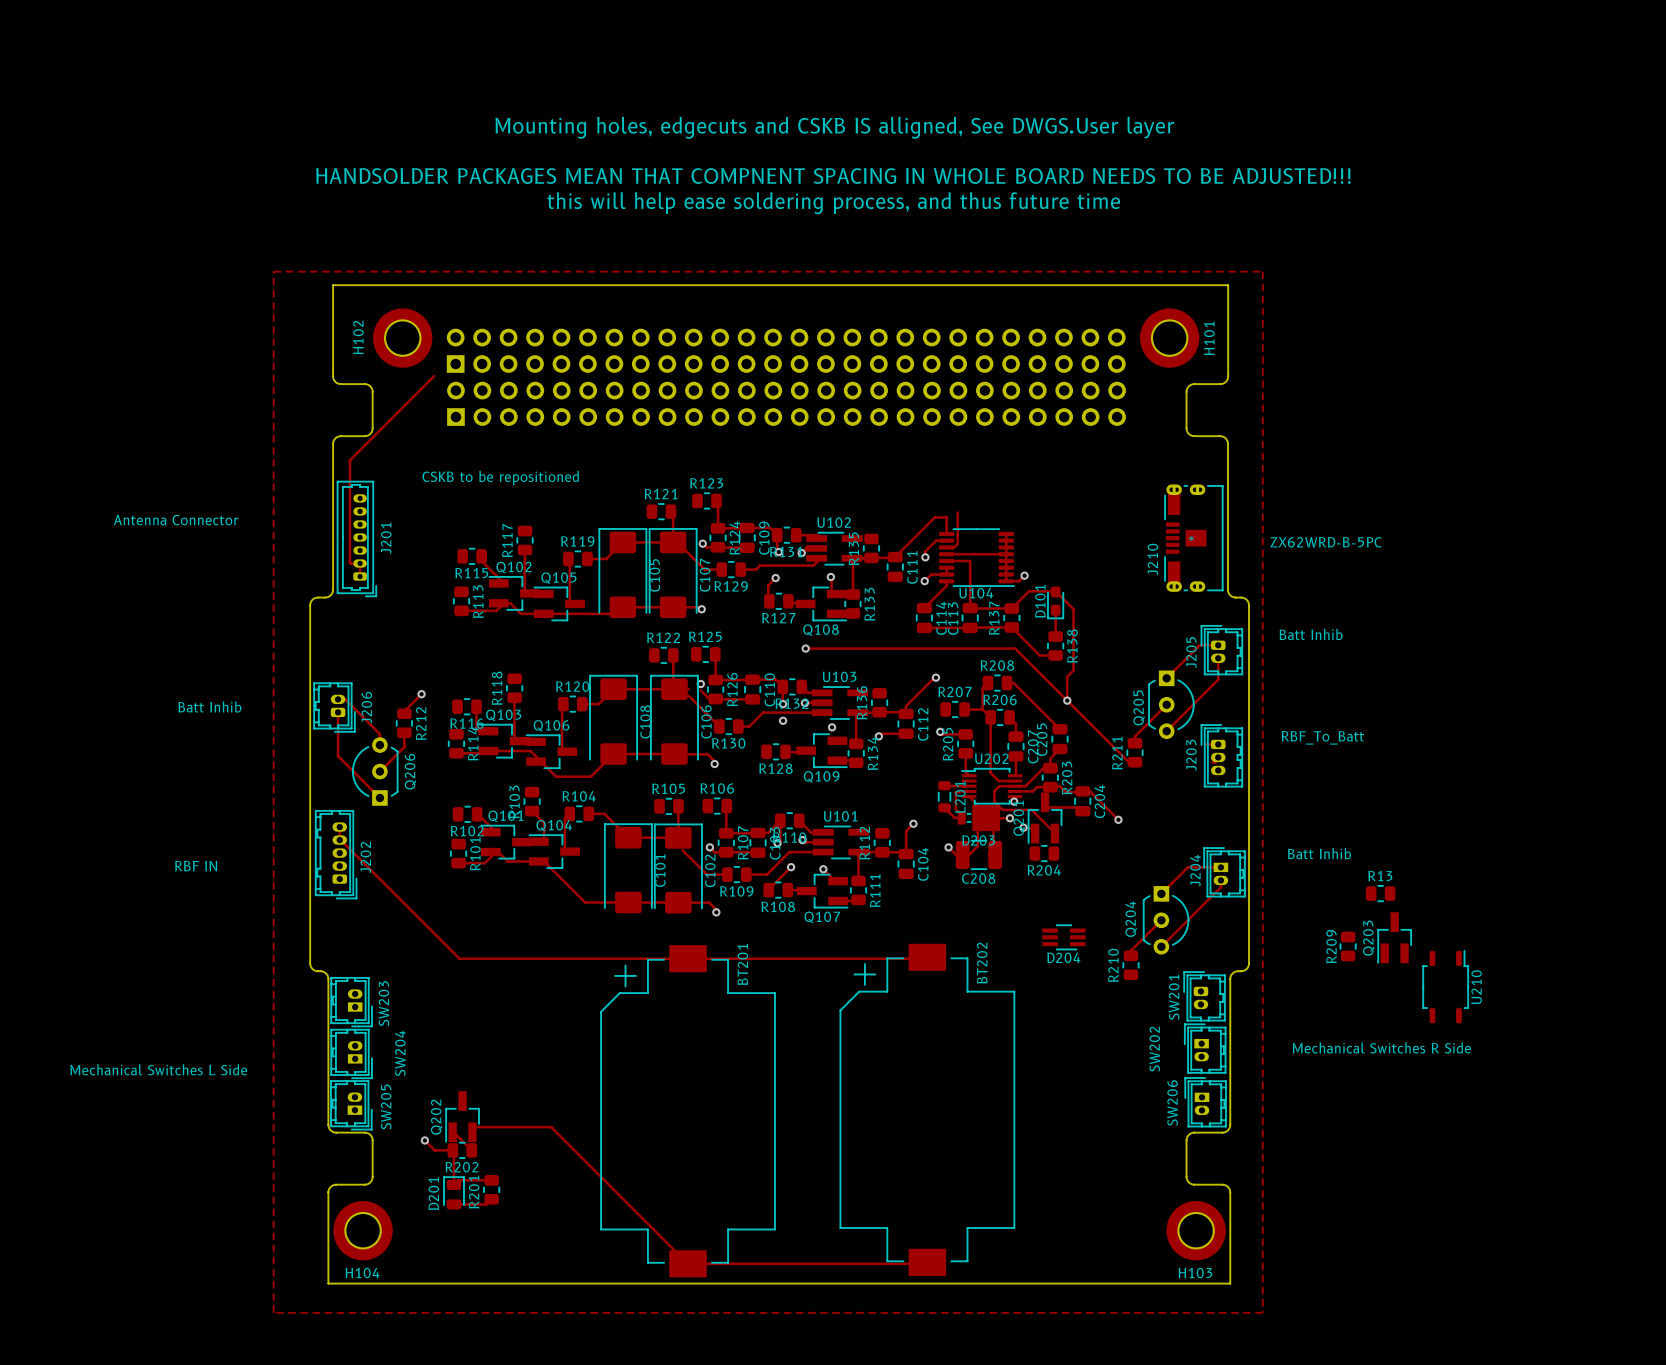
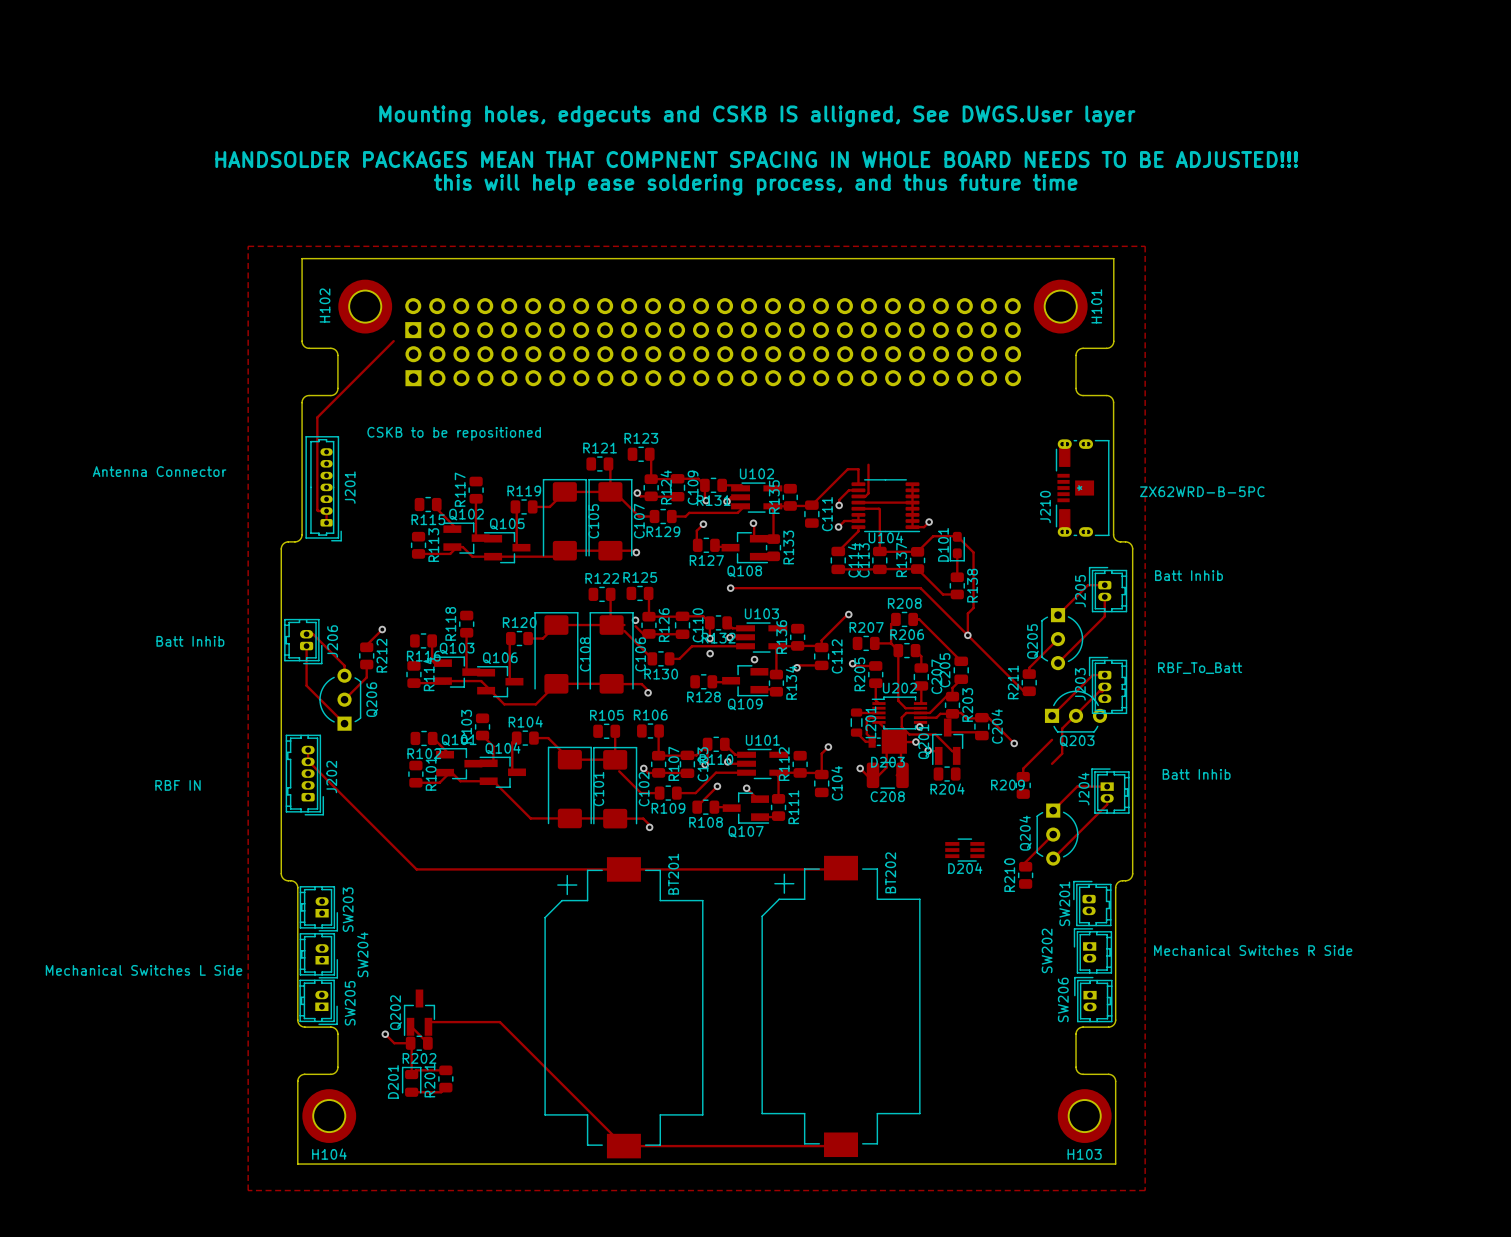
track: none -> (1092, 675) (1052, 715)
track: none -> (1099, 691) (1062, 728) (1062, 753) (1052, 763)
track: none -> (1052, 739) (1023, 768) (1023, 776)
R13: (1380, 893) -> none
Q203 footprint: [1377, 912, 1412, 964] -> [1044, 690, 1108, 733]
Q203 name position: Q203 (1368, 938) -> Q203 (1077, 741)
R209 name rotation: 0° (1331, 946) -> 90° clockwise (1007, 785)
R209 position: (1348, 946) -> (1023, 785)
U210: (1445, 986) -> none

